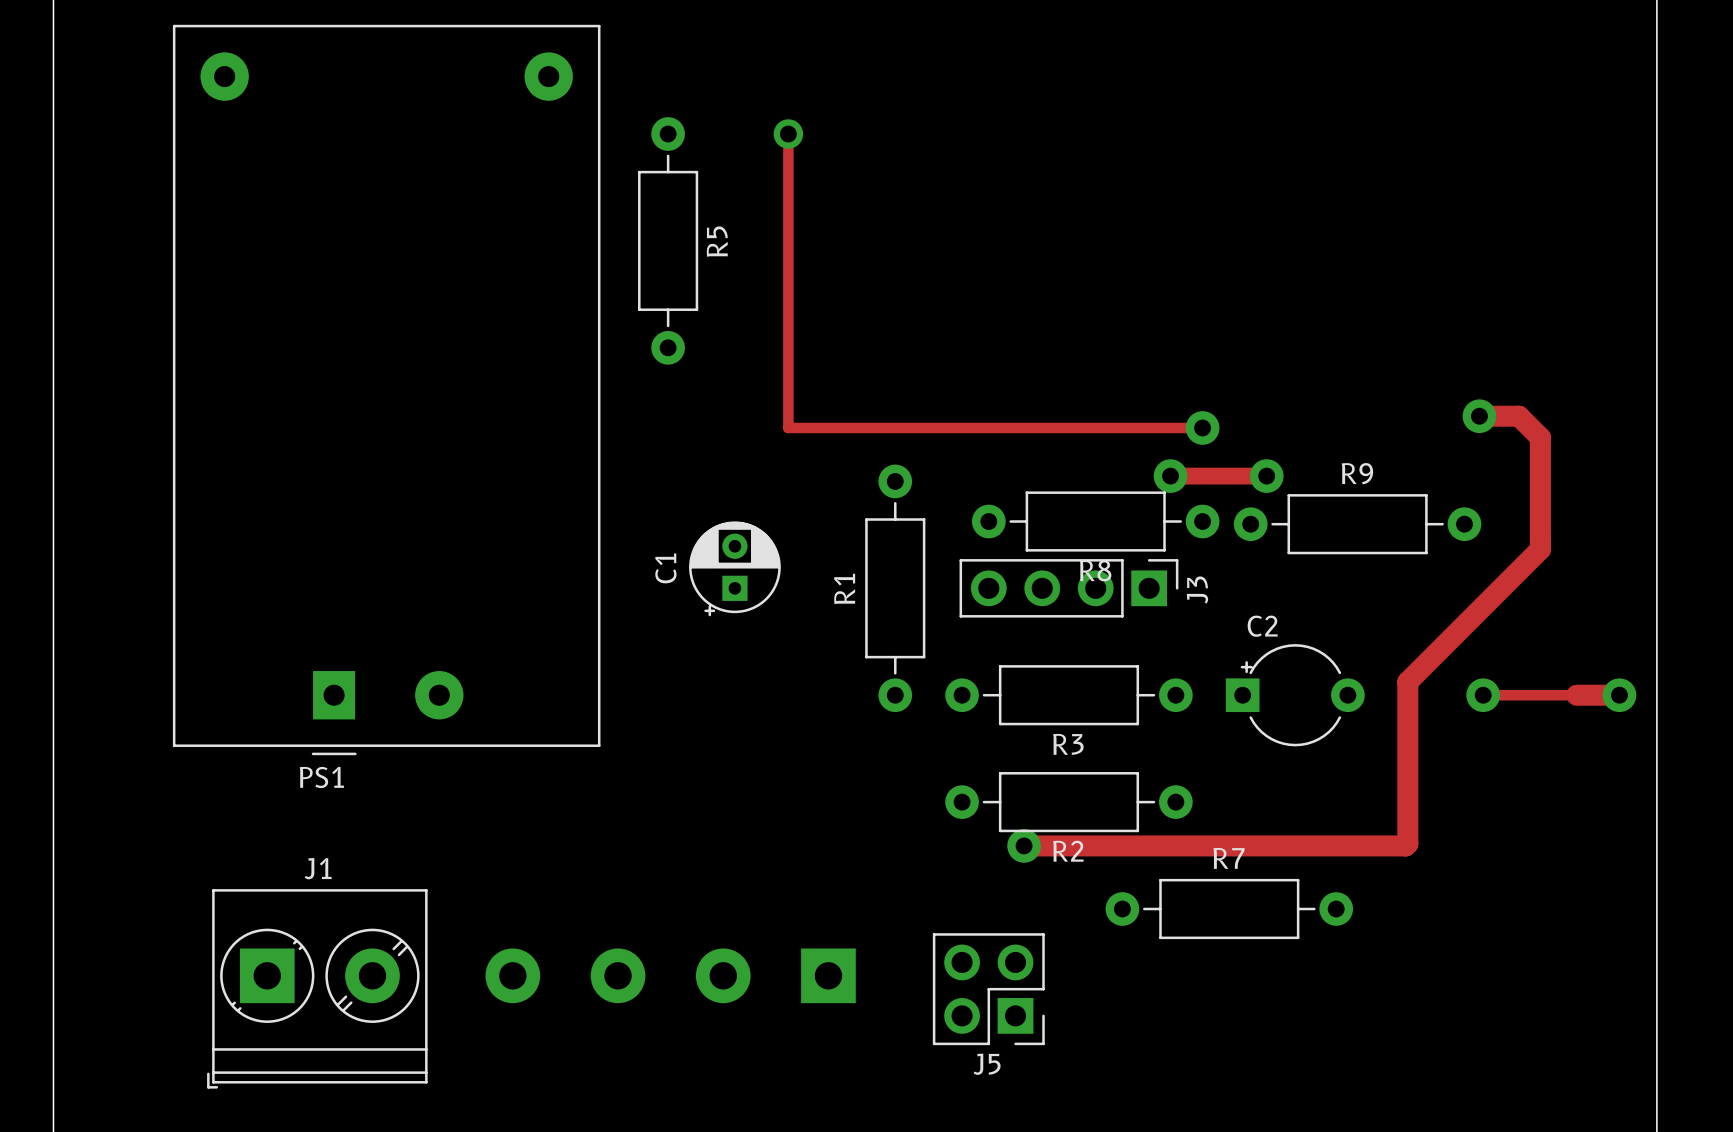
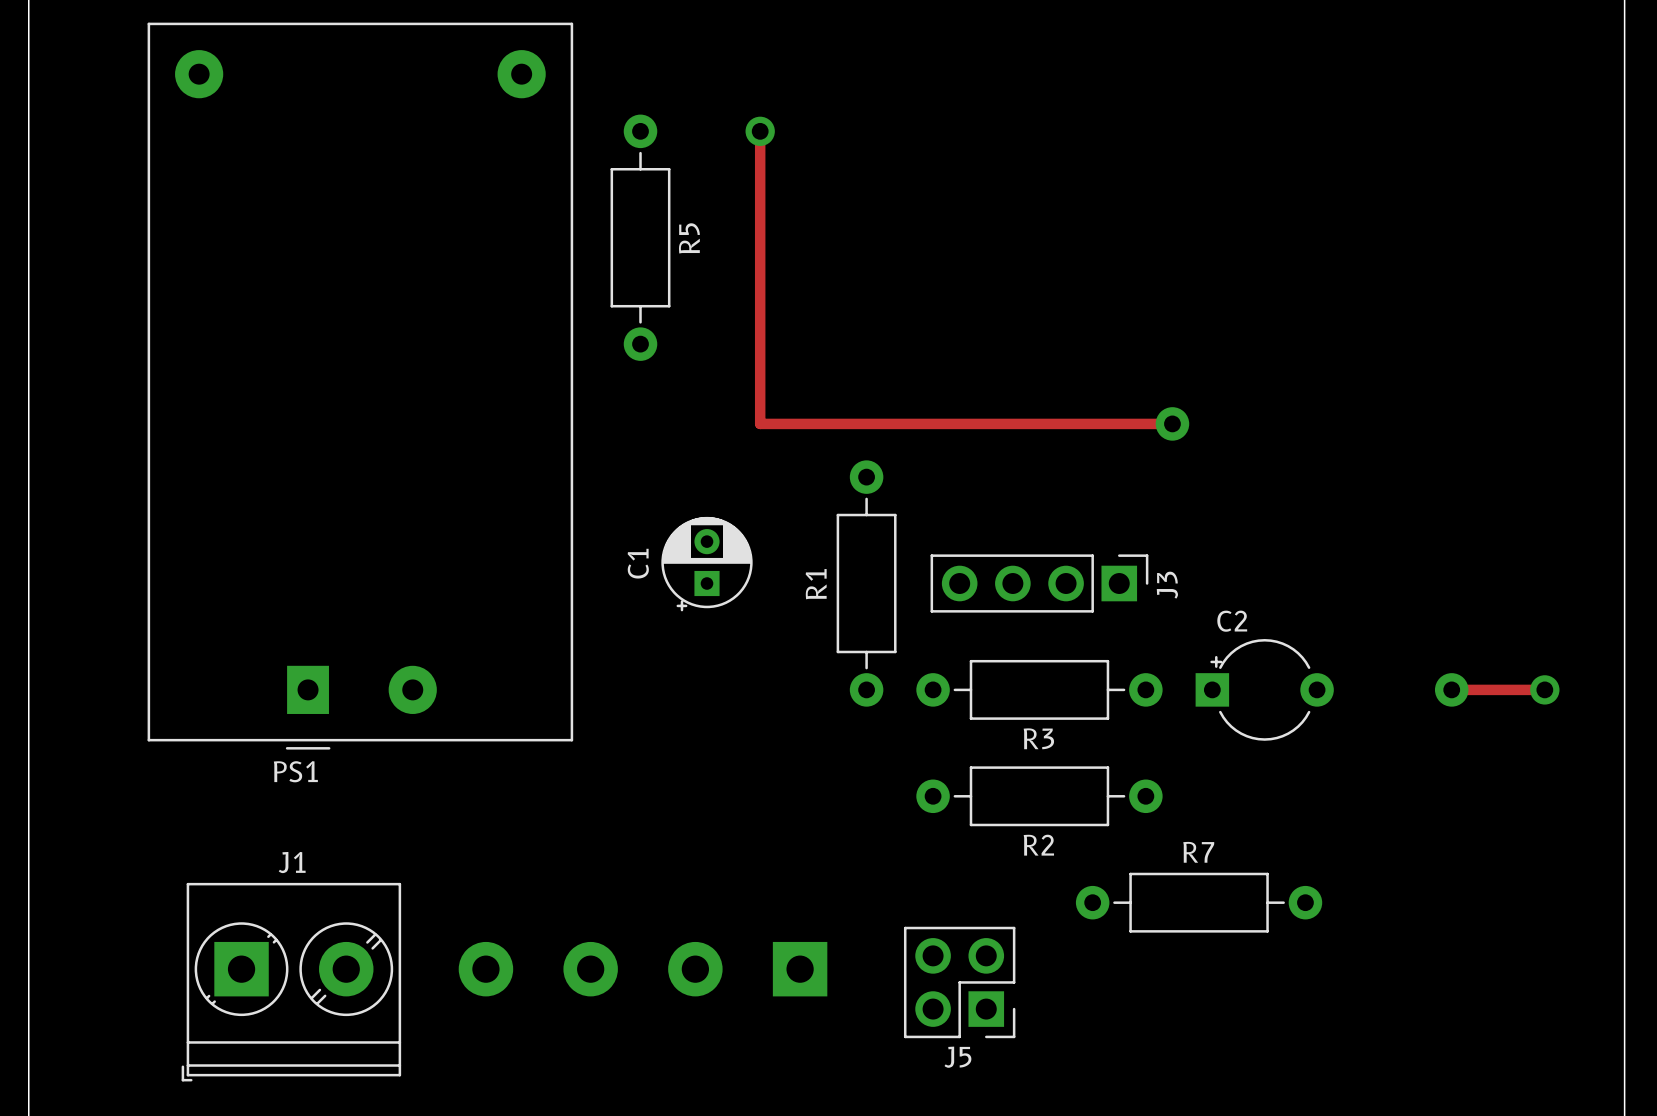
track: (1479, 416) (1519, 416) (1540, 437) (1540, 549) (1407, 681) (1407, 843) (1405, 845) (1024, 845) -> none
via: (1479, 416) -> none
track: (1170, 476) (1266, 476) -> none
via: (1170, 476) -> none
via: (1266, 476) -> none
R8: (1095, 521) -> none
R9: (1357, 524) -> none
track: (1576, 695) (1619, 695) -> none
via: none -> (1544, 689)
via: (1619, 695) -> none
via: (1024, 845) -> none

